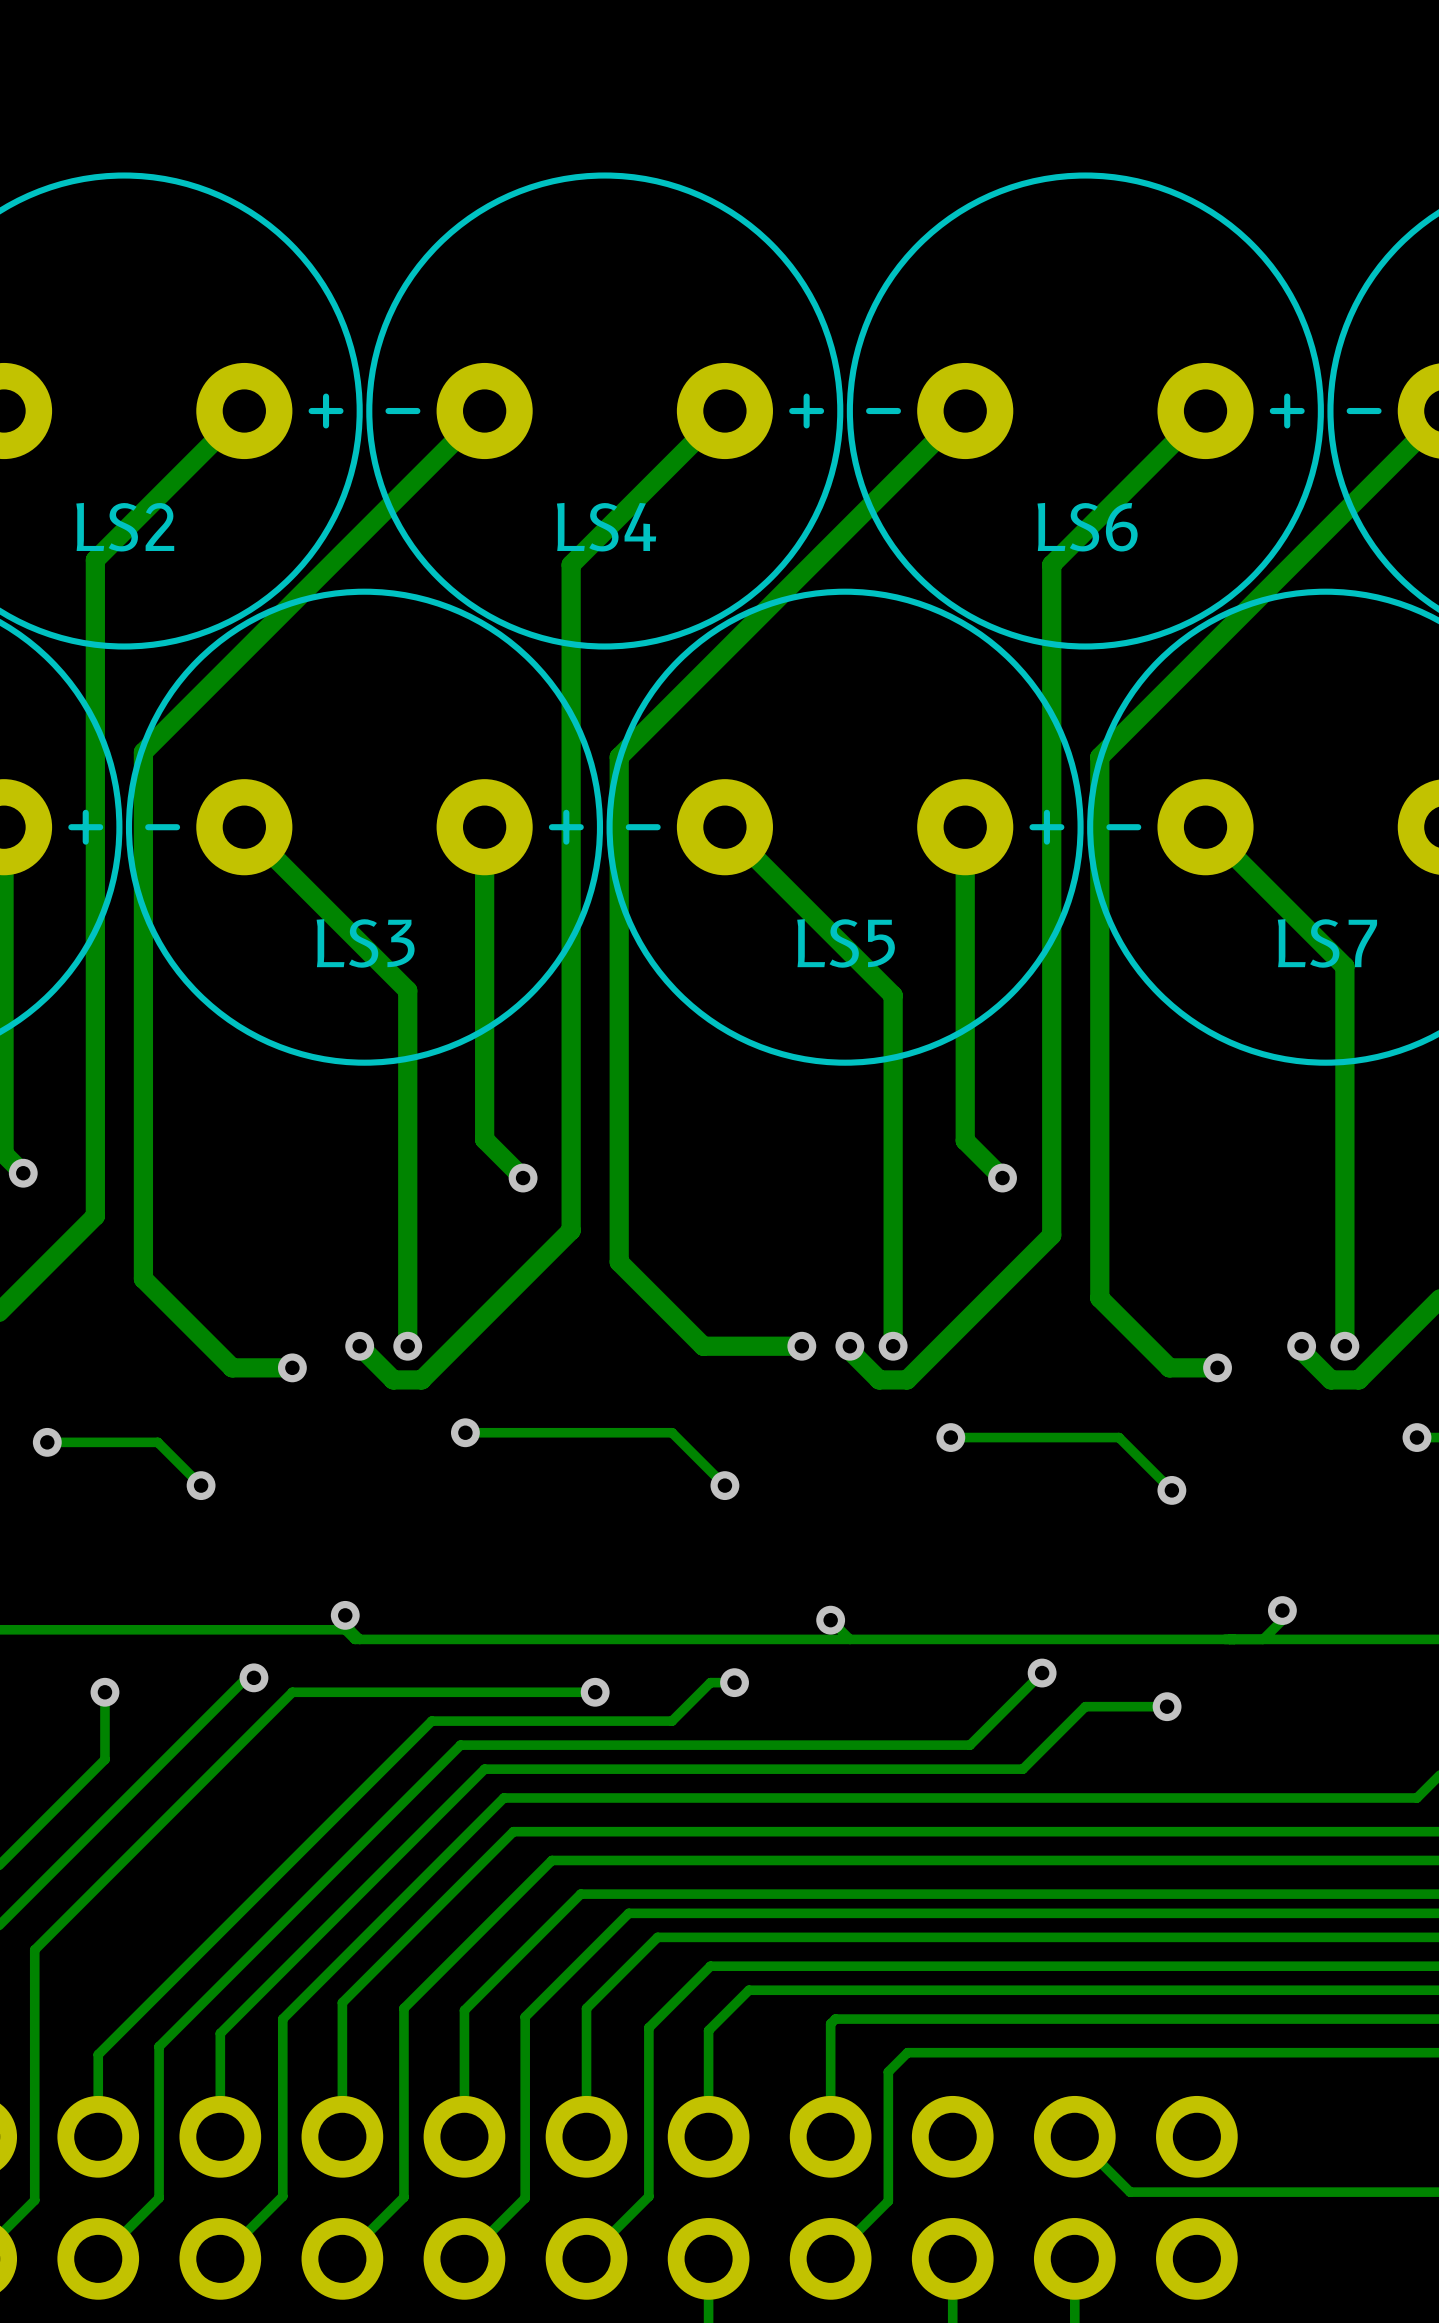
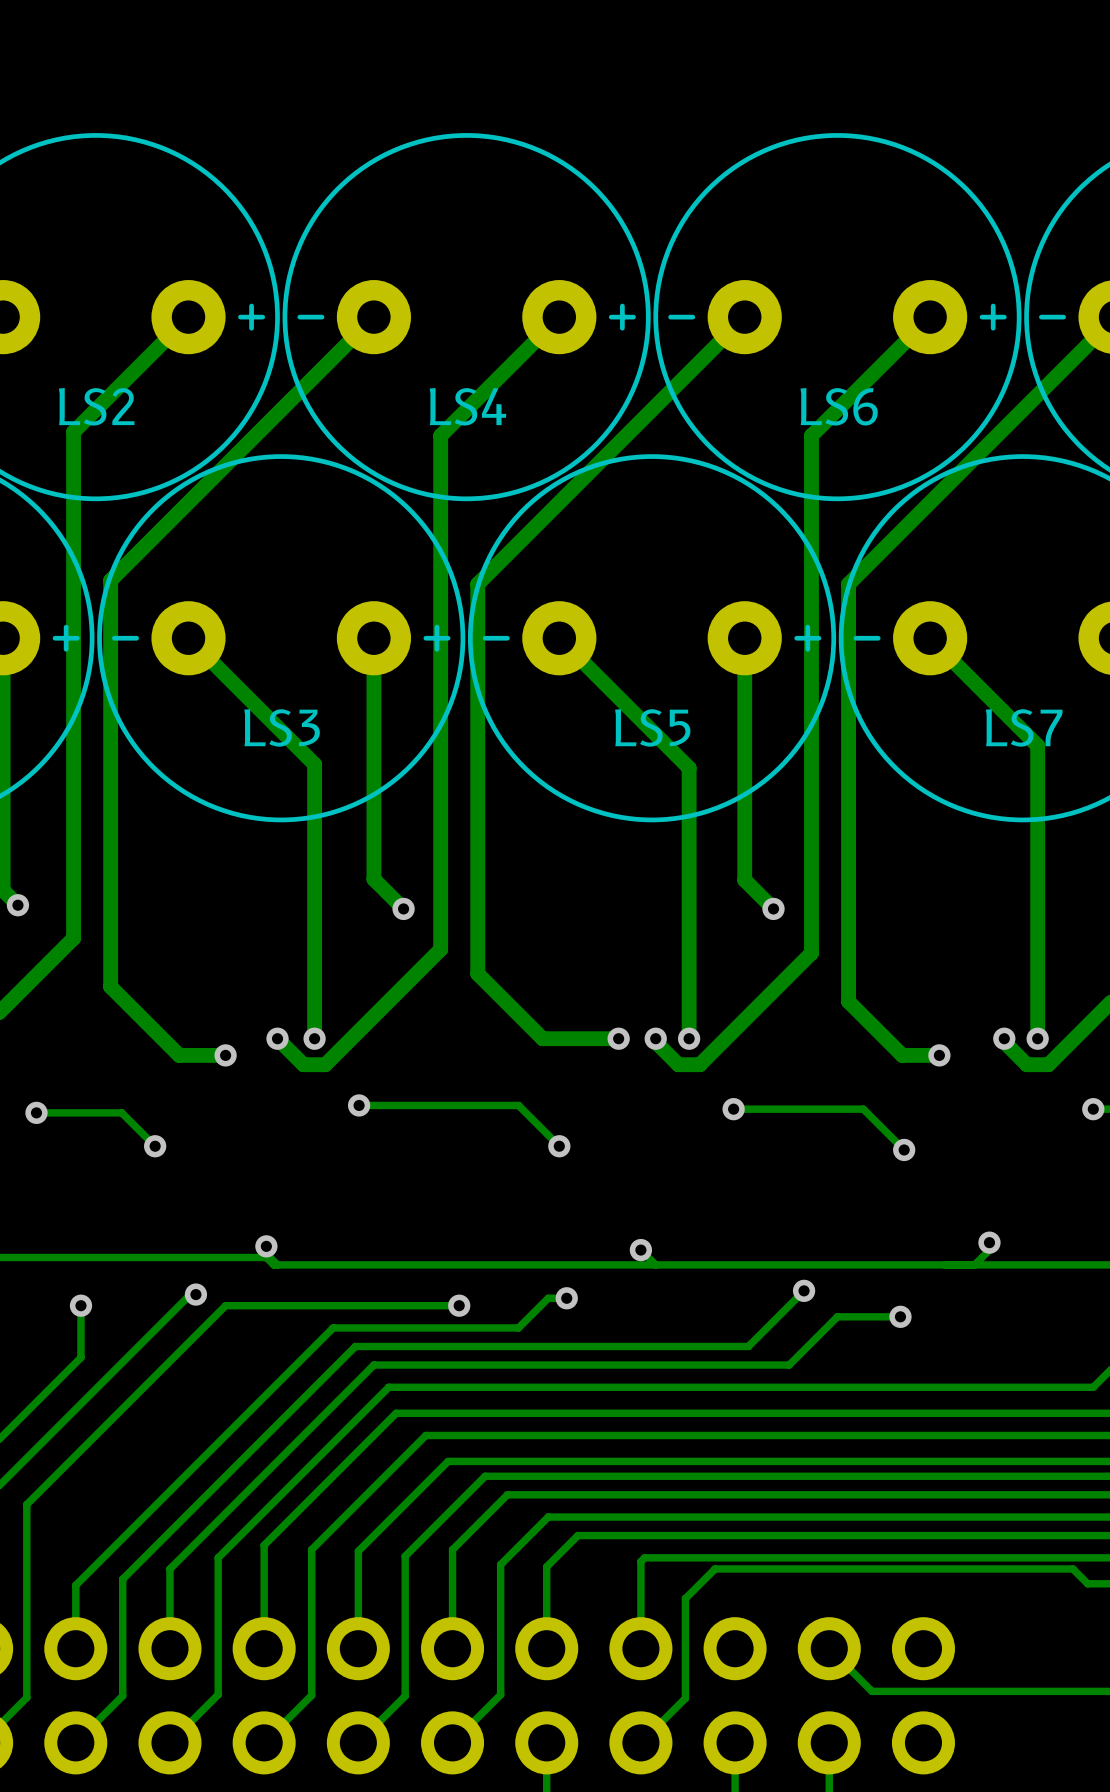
track: (1409, 2052) (907, 2052) -> (1087, 1583) (1072, 1568) (715, 1568) (700, 1583)

